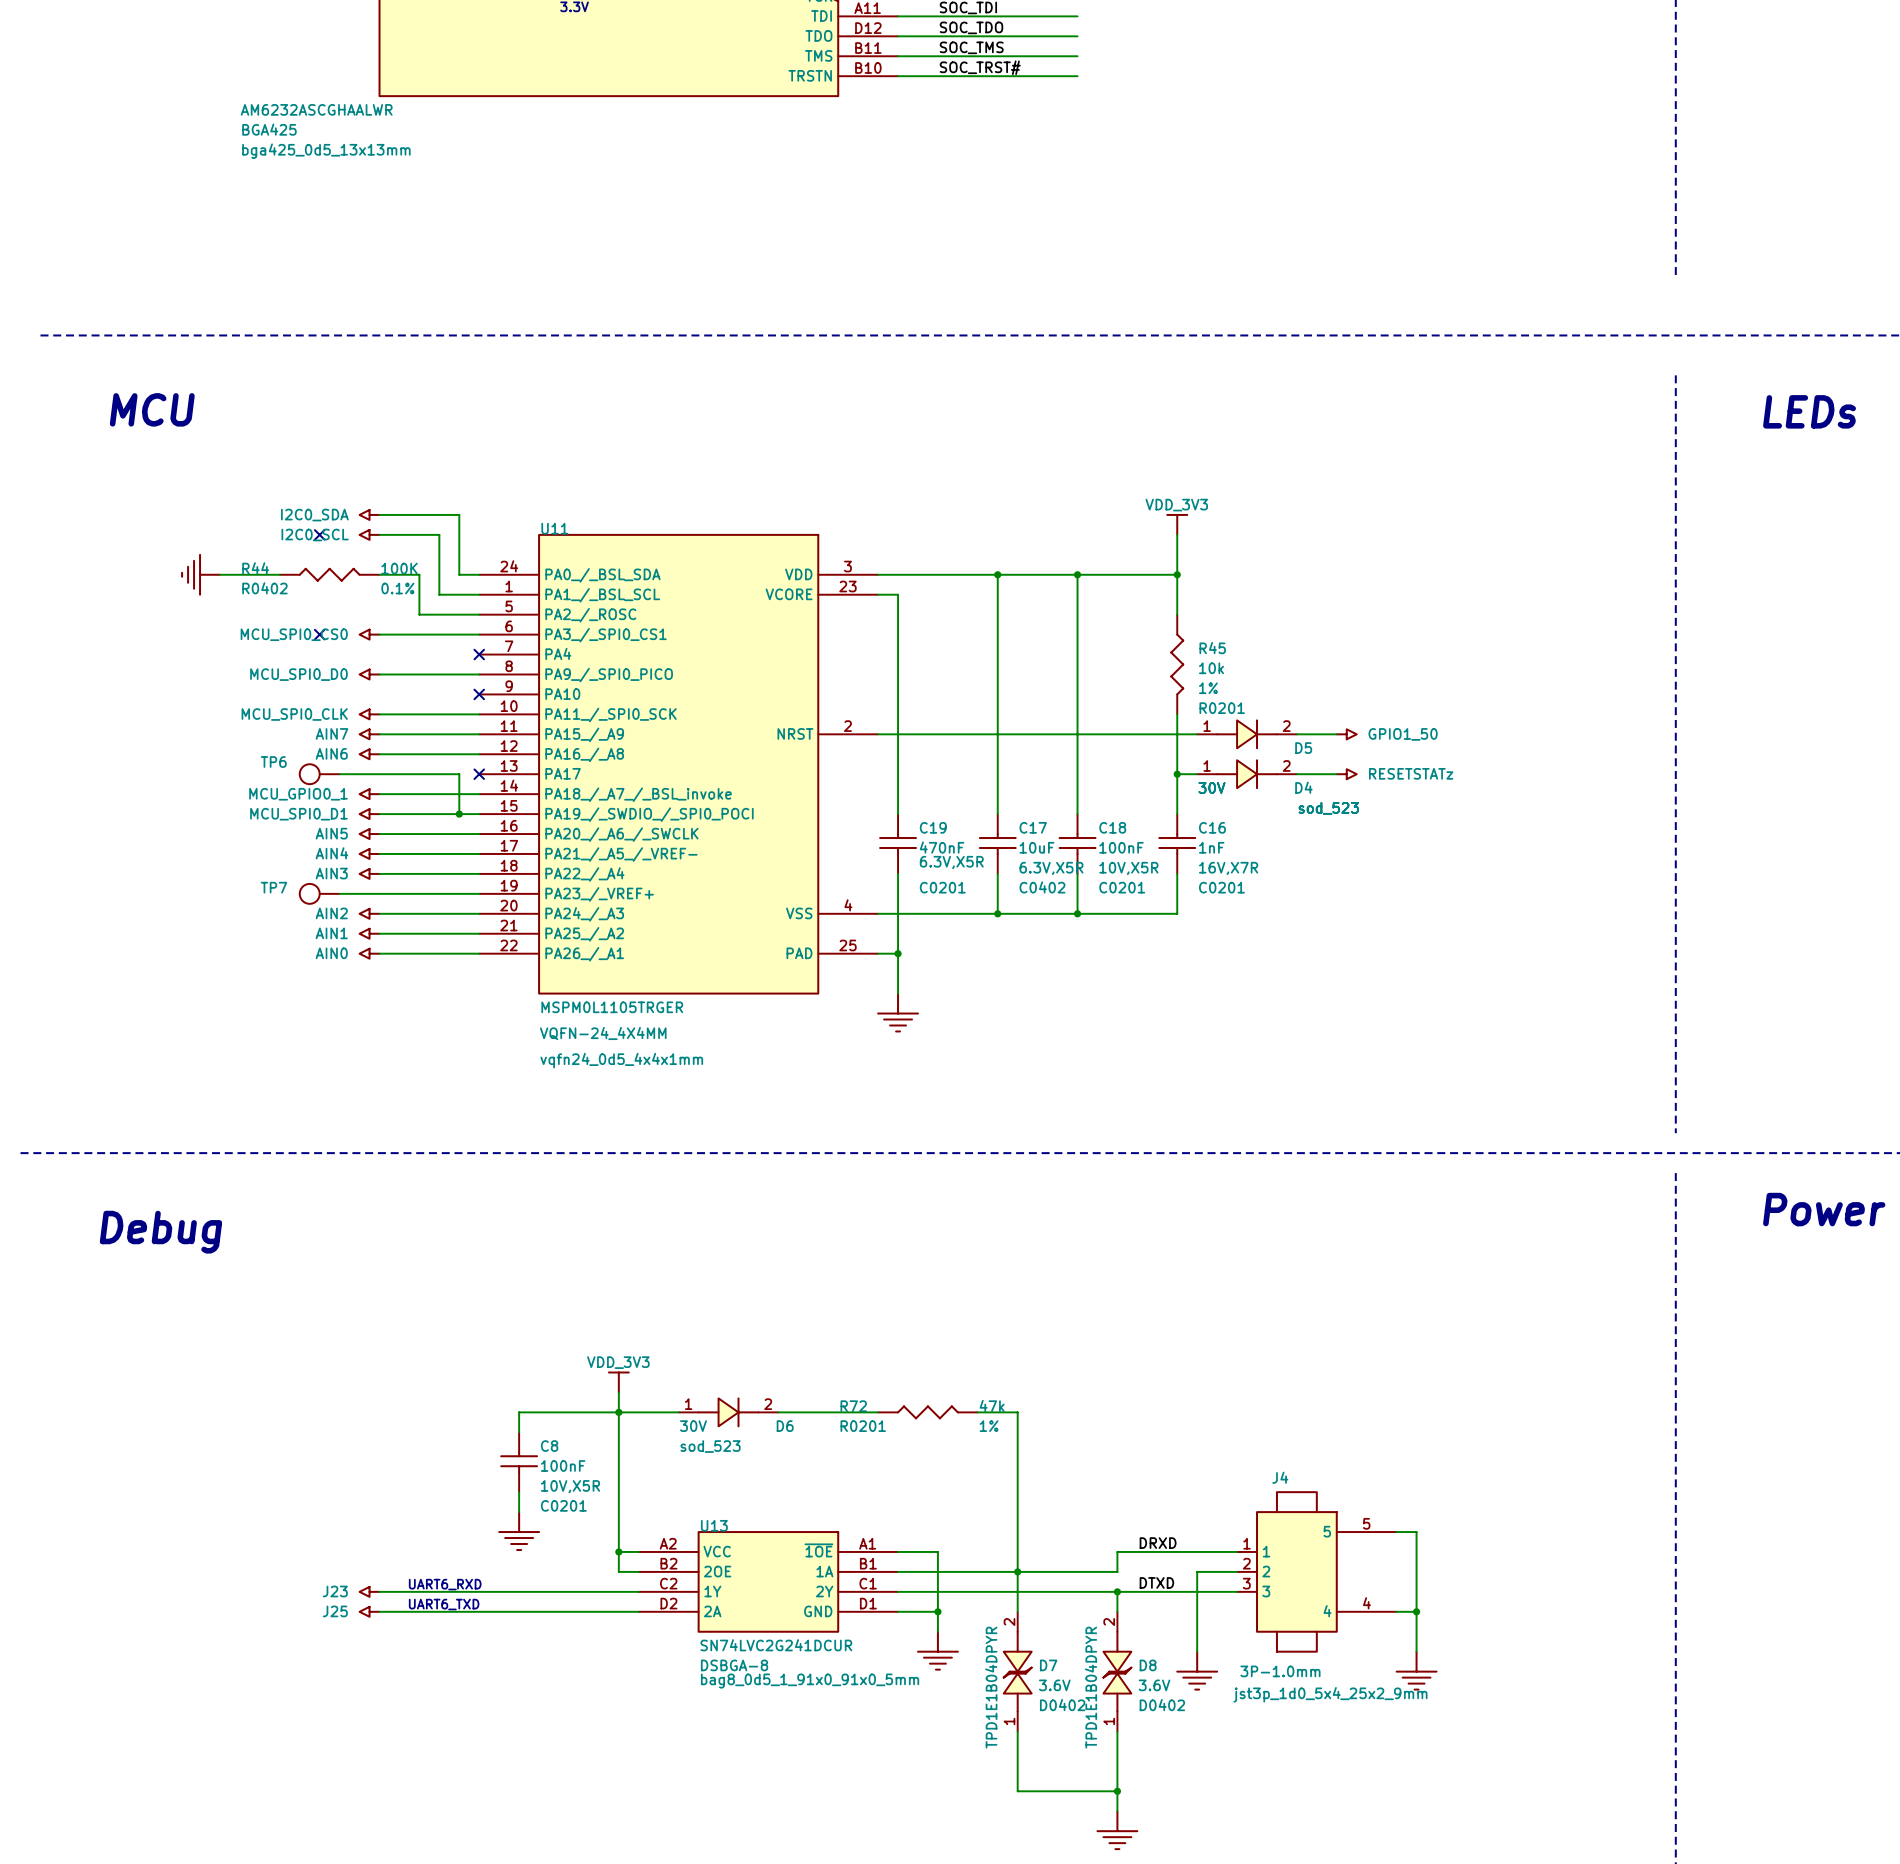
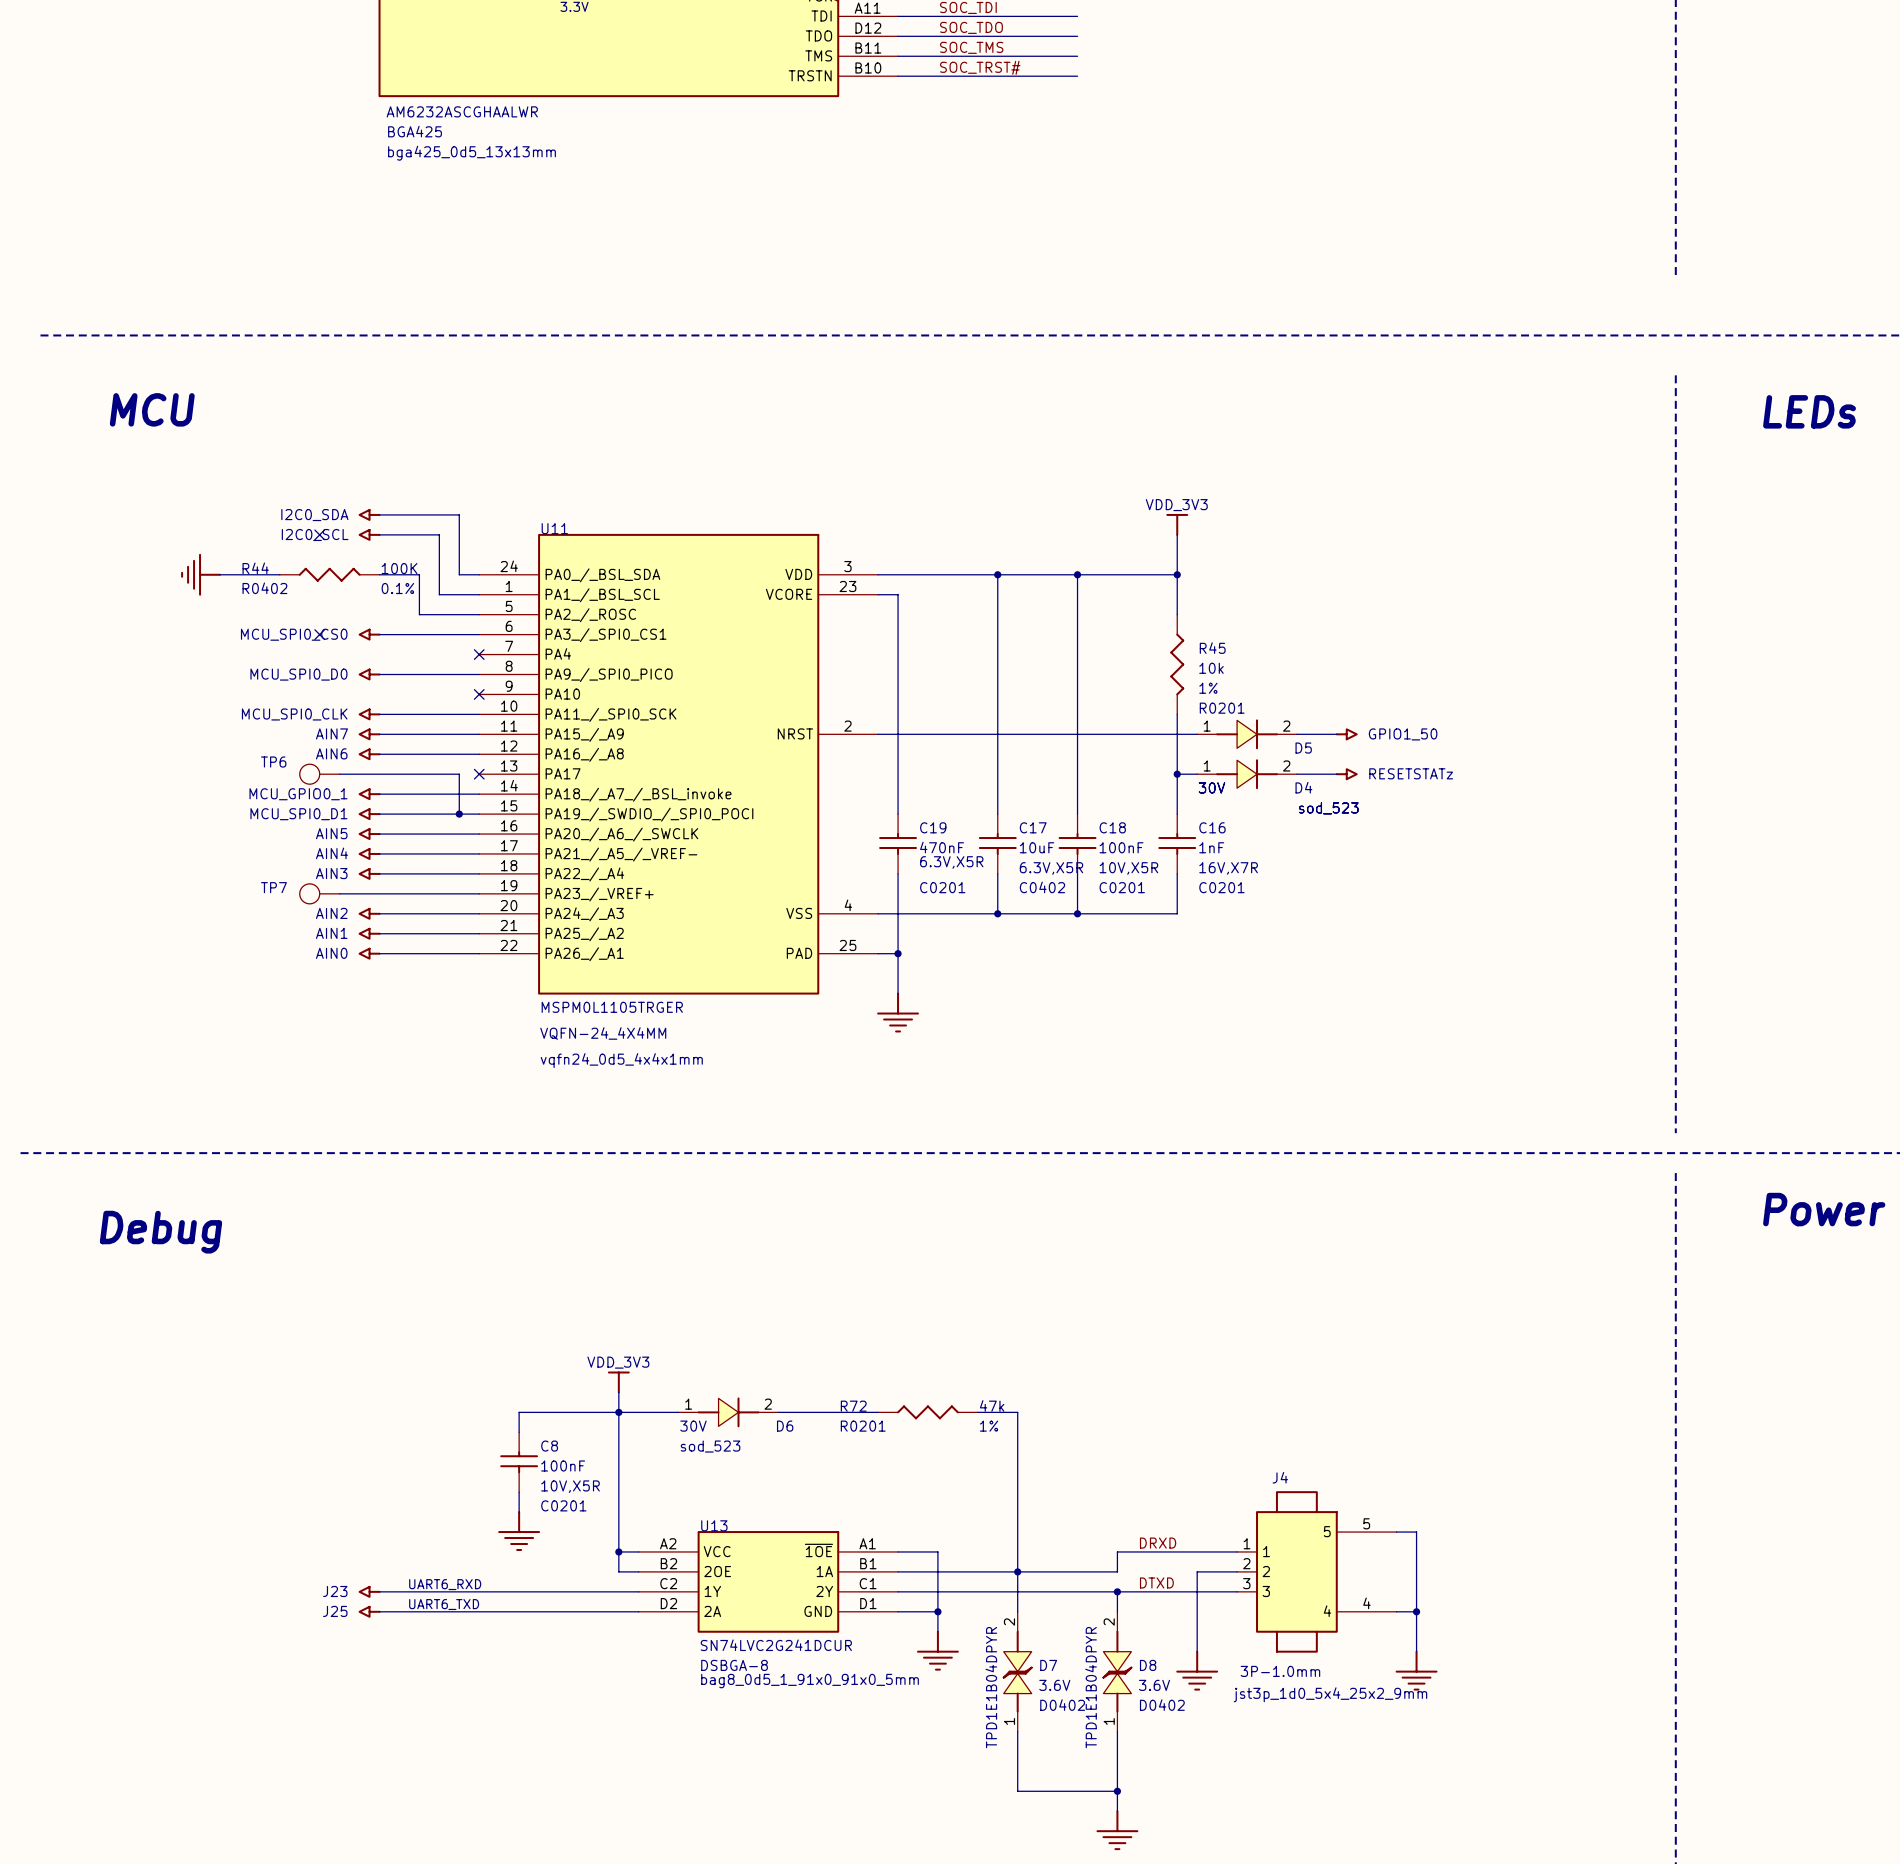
part value position: AM6232ASCGHAALWR (316, 109) -> AM6232ASCGHAALWR (462, 111)
part text position: BGA425 (269, 129) -> BGA425 (415, 131)
part text position: bga425_0d5_13x13mm (326, 151) -> bga425_0d5_13x13mm (472, 153)

